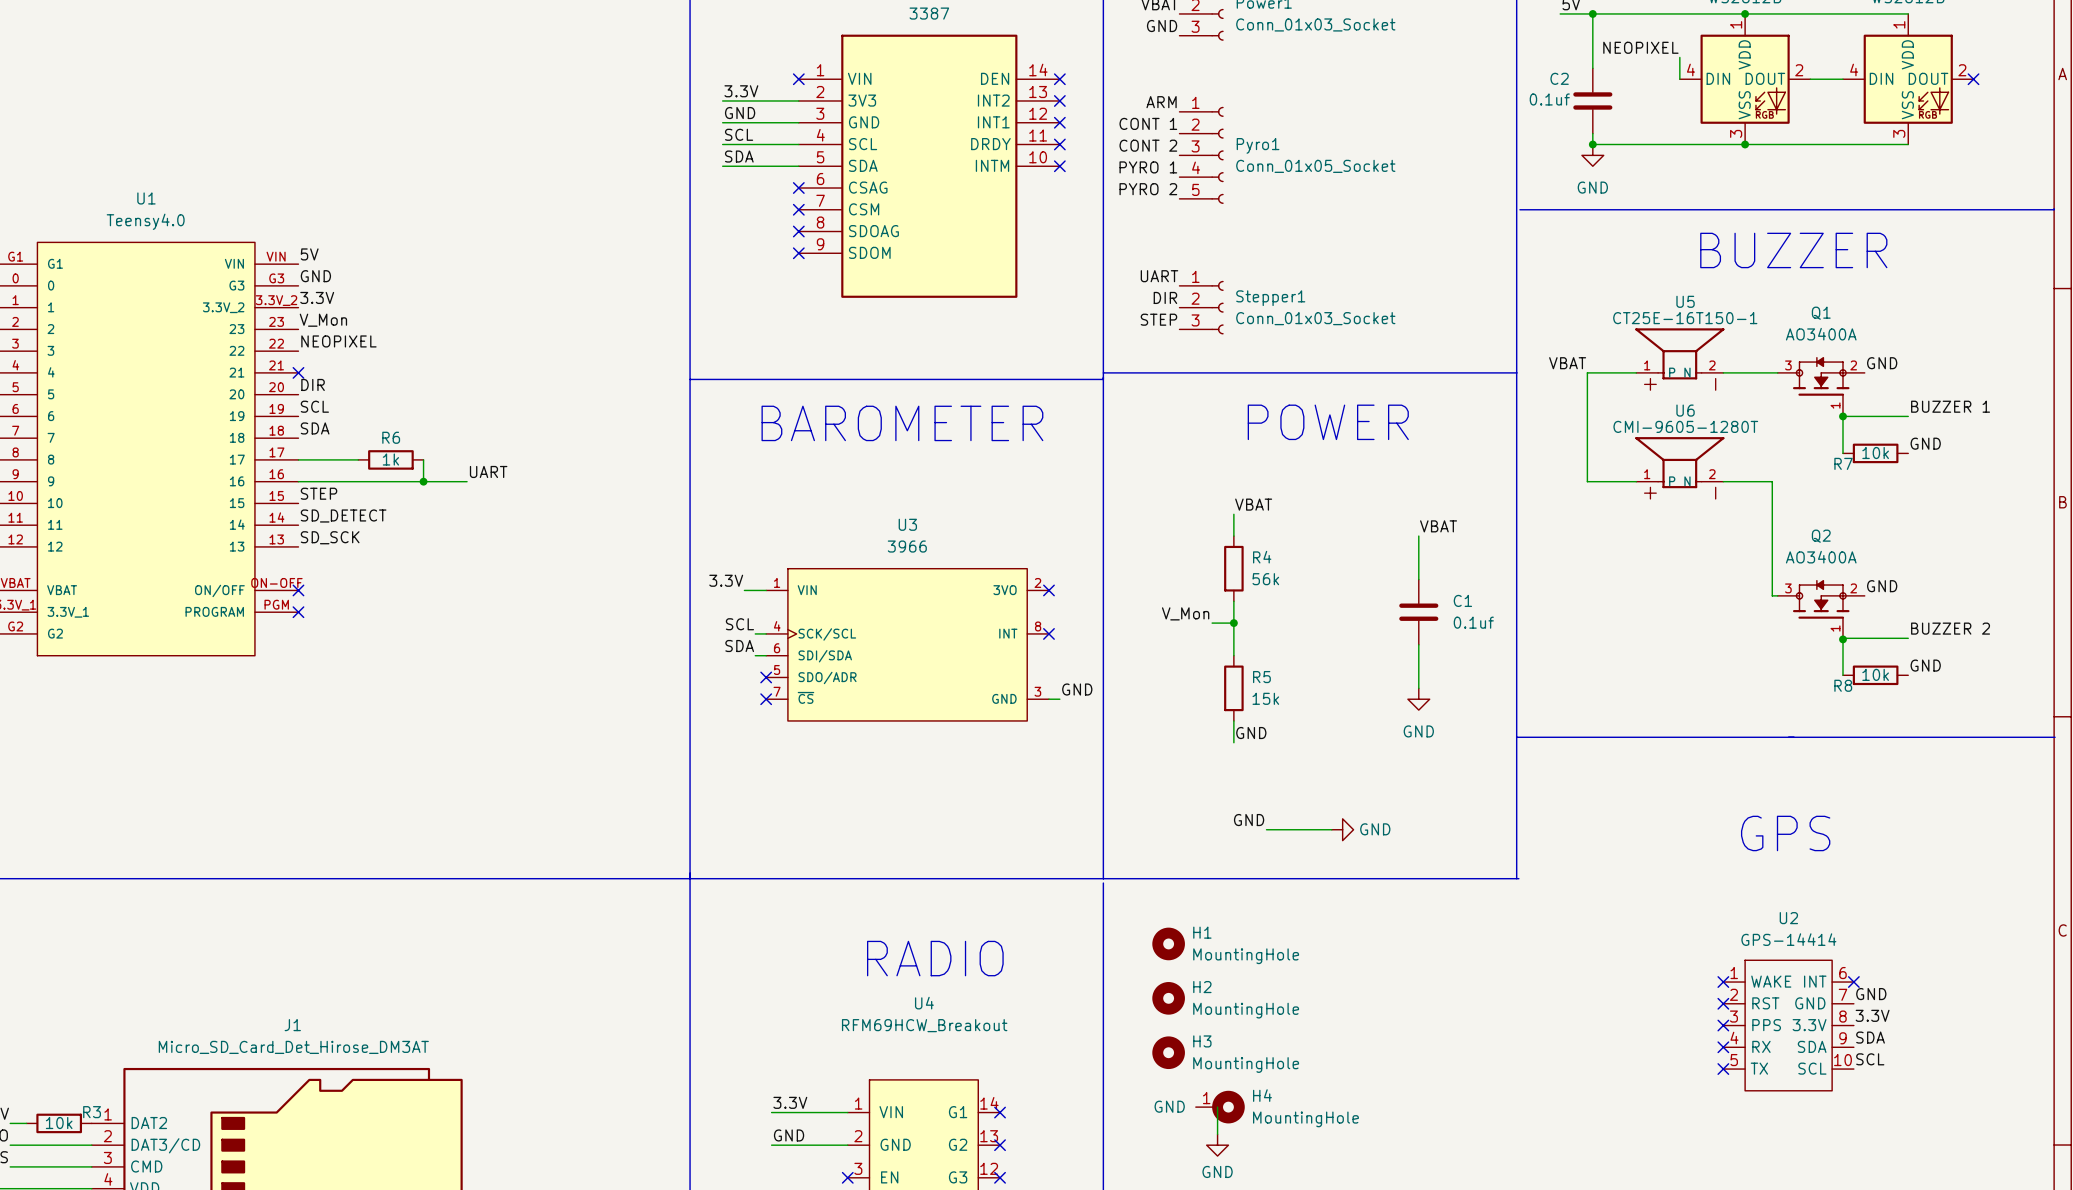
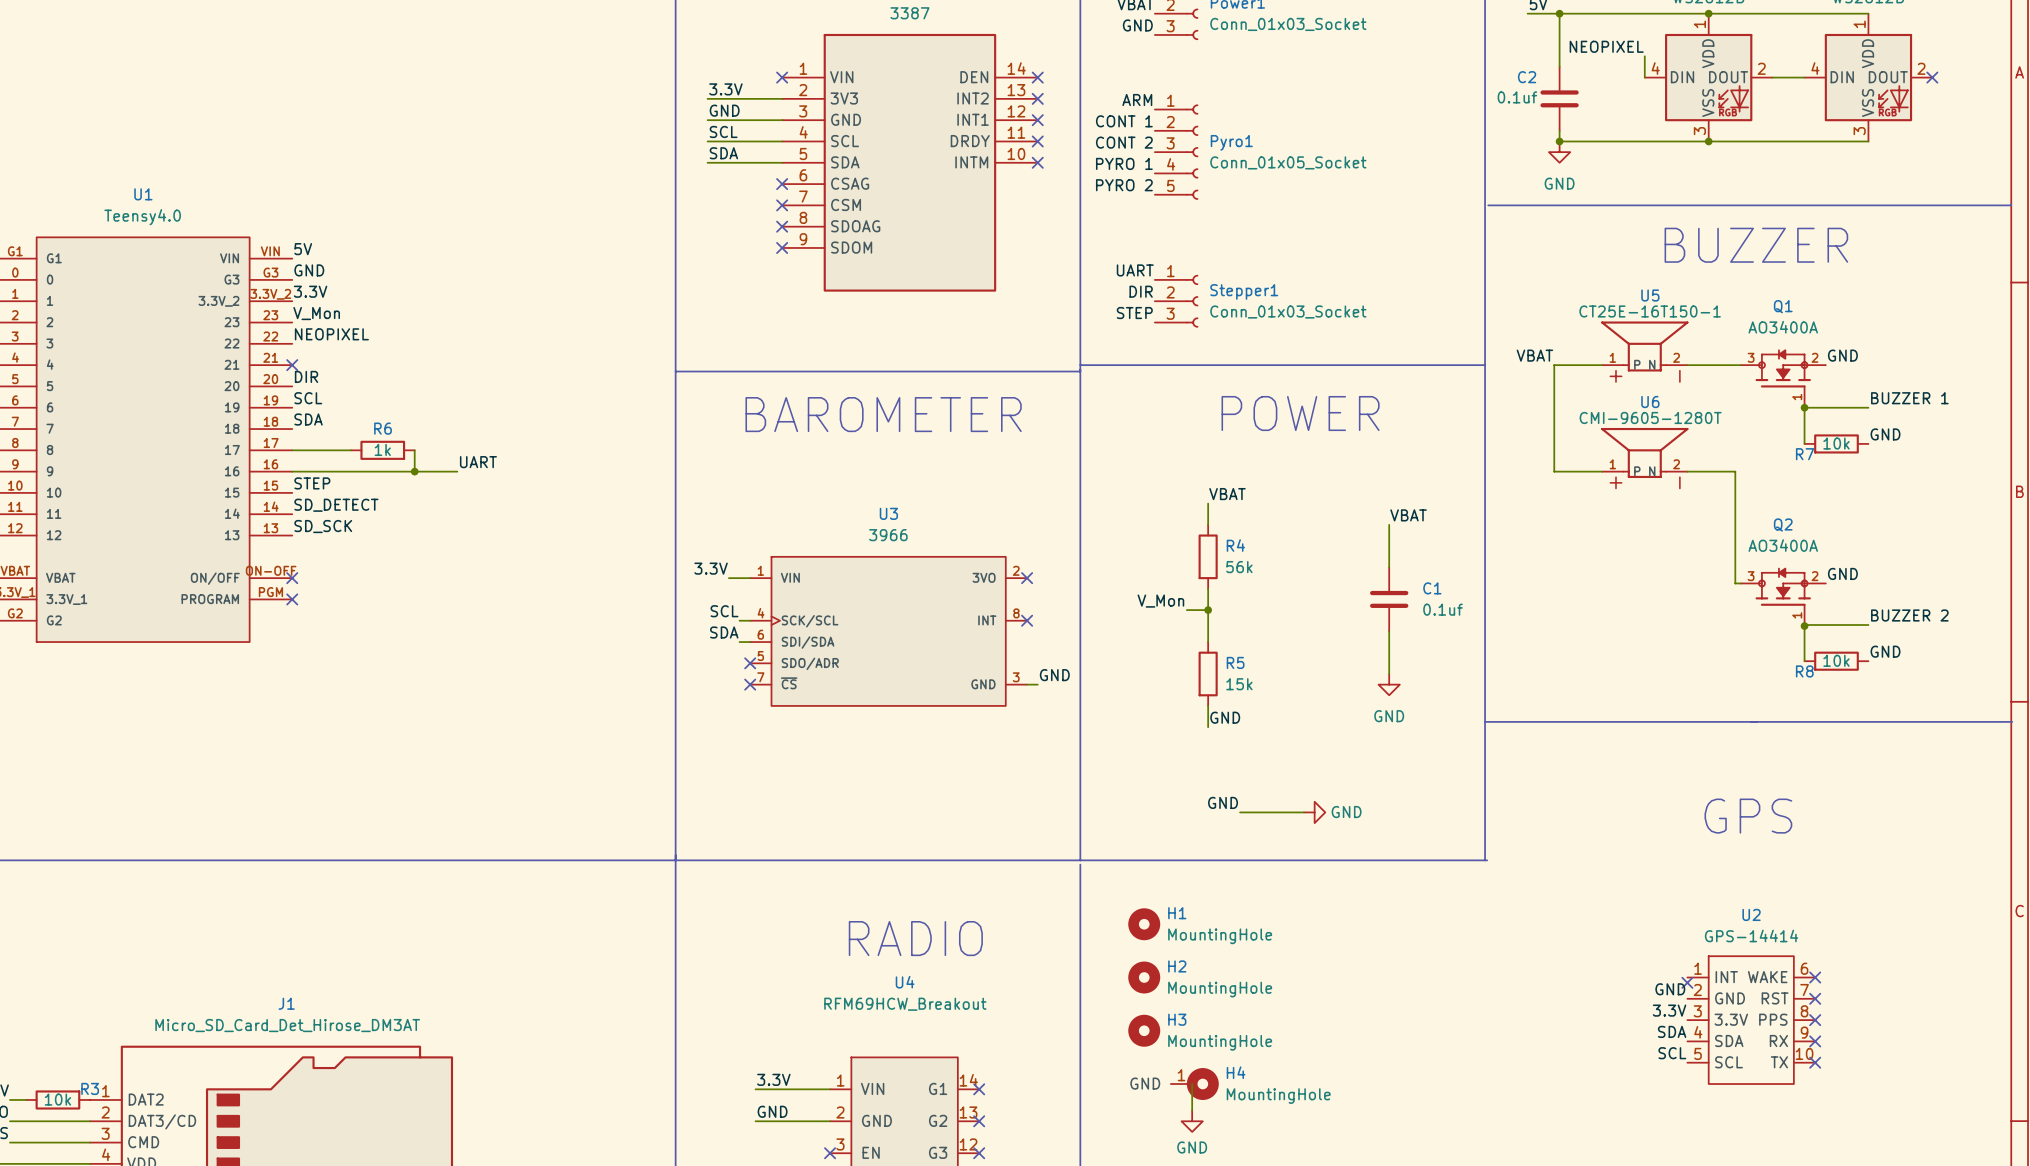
U2 symbol: [1723, 960, 1854, 1091] -> [1687, 956, 1816, 1085]
no-connect mark: (1723, 982) -> none
no-connect mark position: (1853, 982) -> (1815, 977)
label position: GND (1871, 994) -> GND (1670, 989)
label position: 3.3V (1872, 1015) -> 3.3V (1669, 1010)
no-connect mark: none -> (1815, 998)
no-connect mark: (1723, 1025) -> none
label position: SDA (1870, 1037) -> SDA (1672, 1031)
no-connect mark: none -> (1815, 1020)
no-connect mark: (1723, 1047) -> none
label position: SCL (1870, 1059) -> SCL (1672, 1053)
no-connect mark: none -> (1815, 1041)
no-connect mark: (1723, 1069) -> none
no-connect mark: none -> (1815, 1062)

